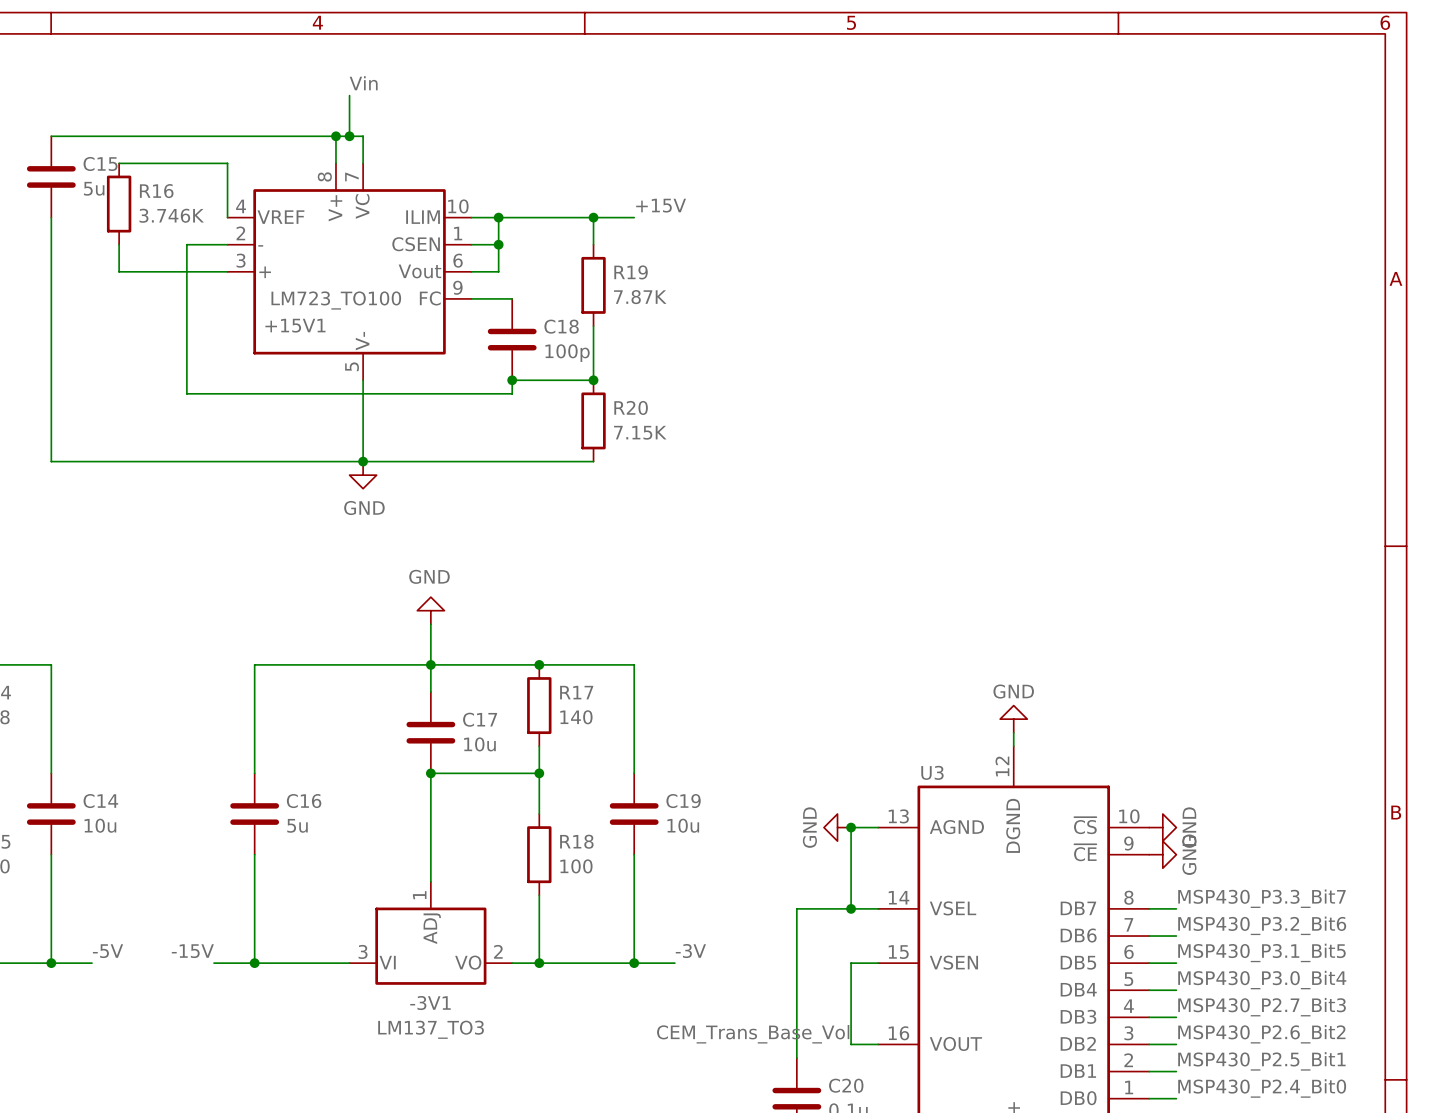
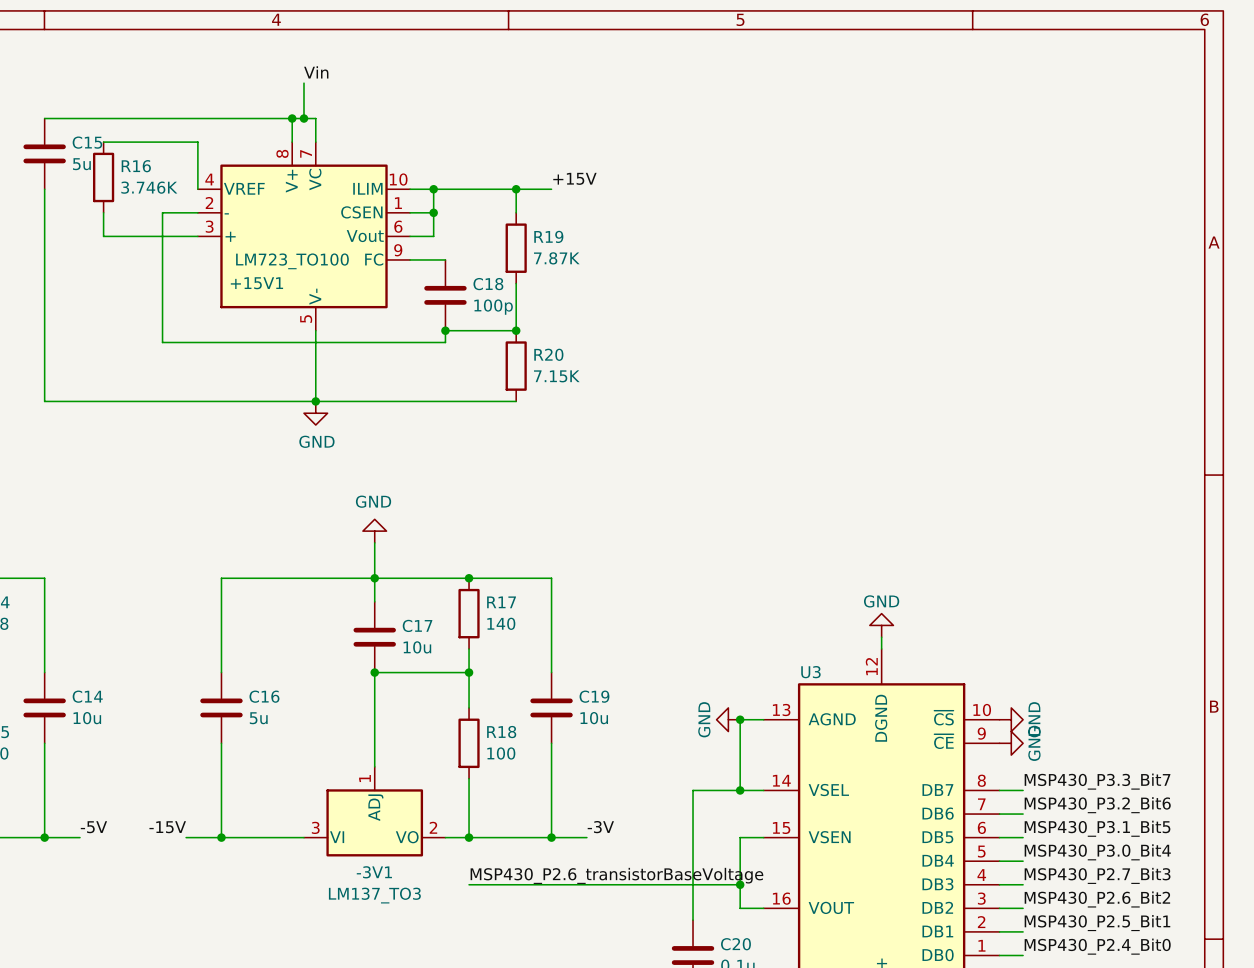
label: none -> MSP430_P2.6_transistorBaseVoltage (616, 875)
wire: none -> (469, 884) (740, 884)
junction: none -> (740, 884)
label: CEM_Trans_Base_Vol (753, 1034) -> none

